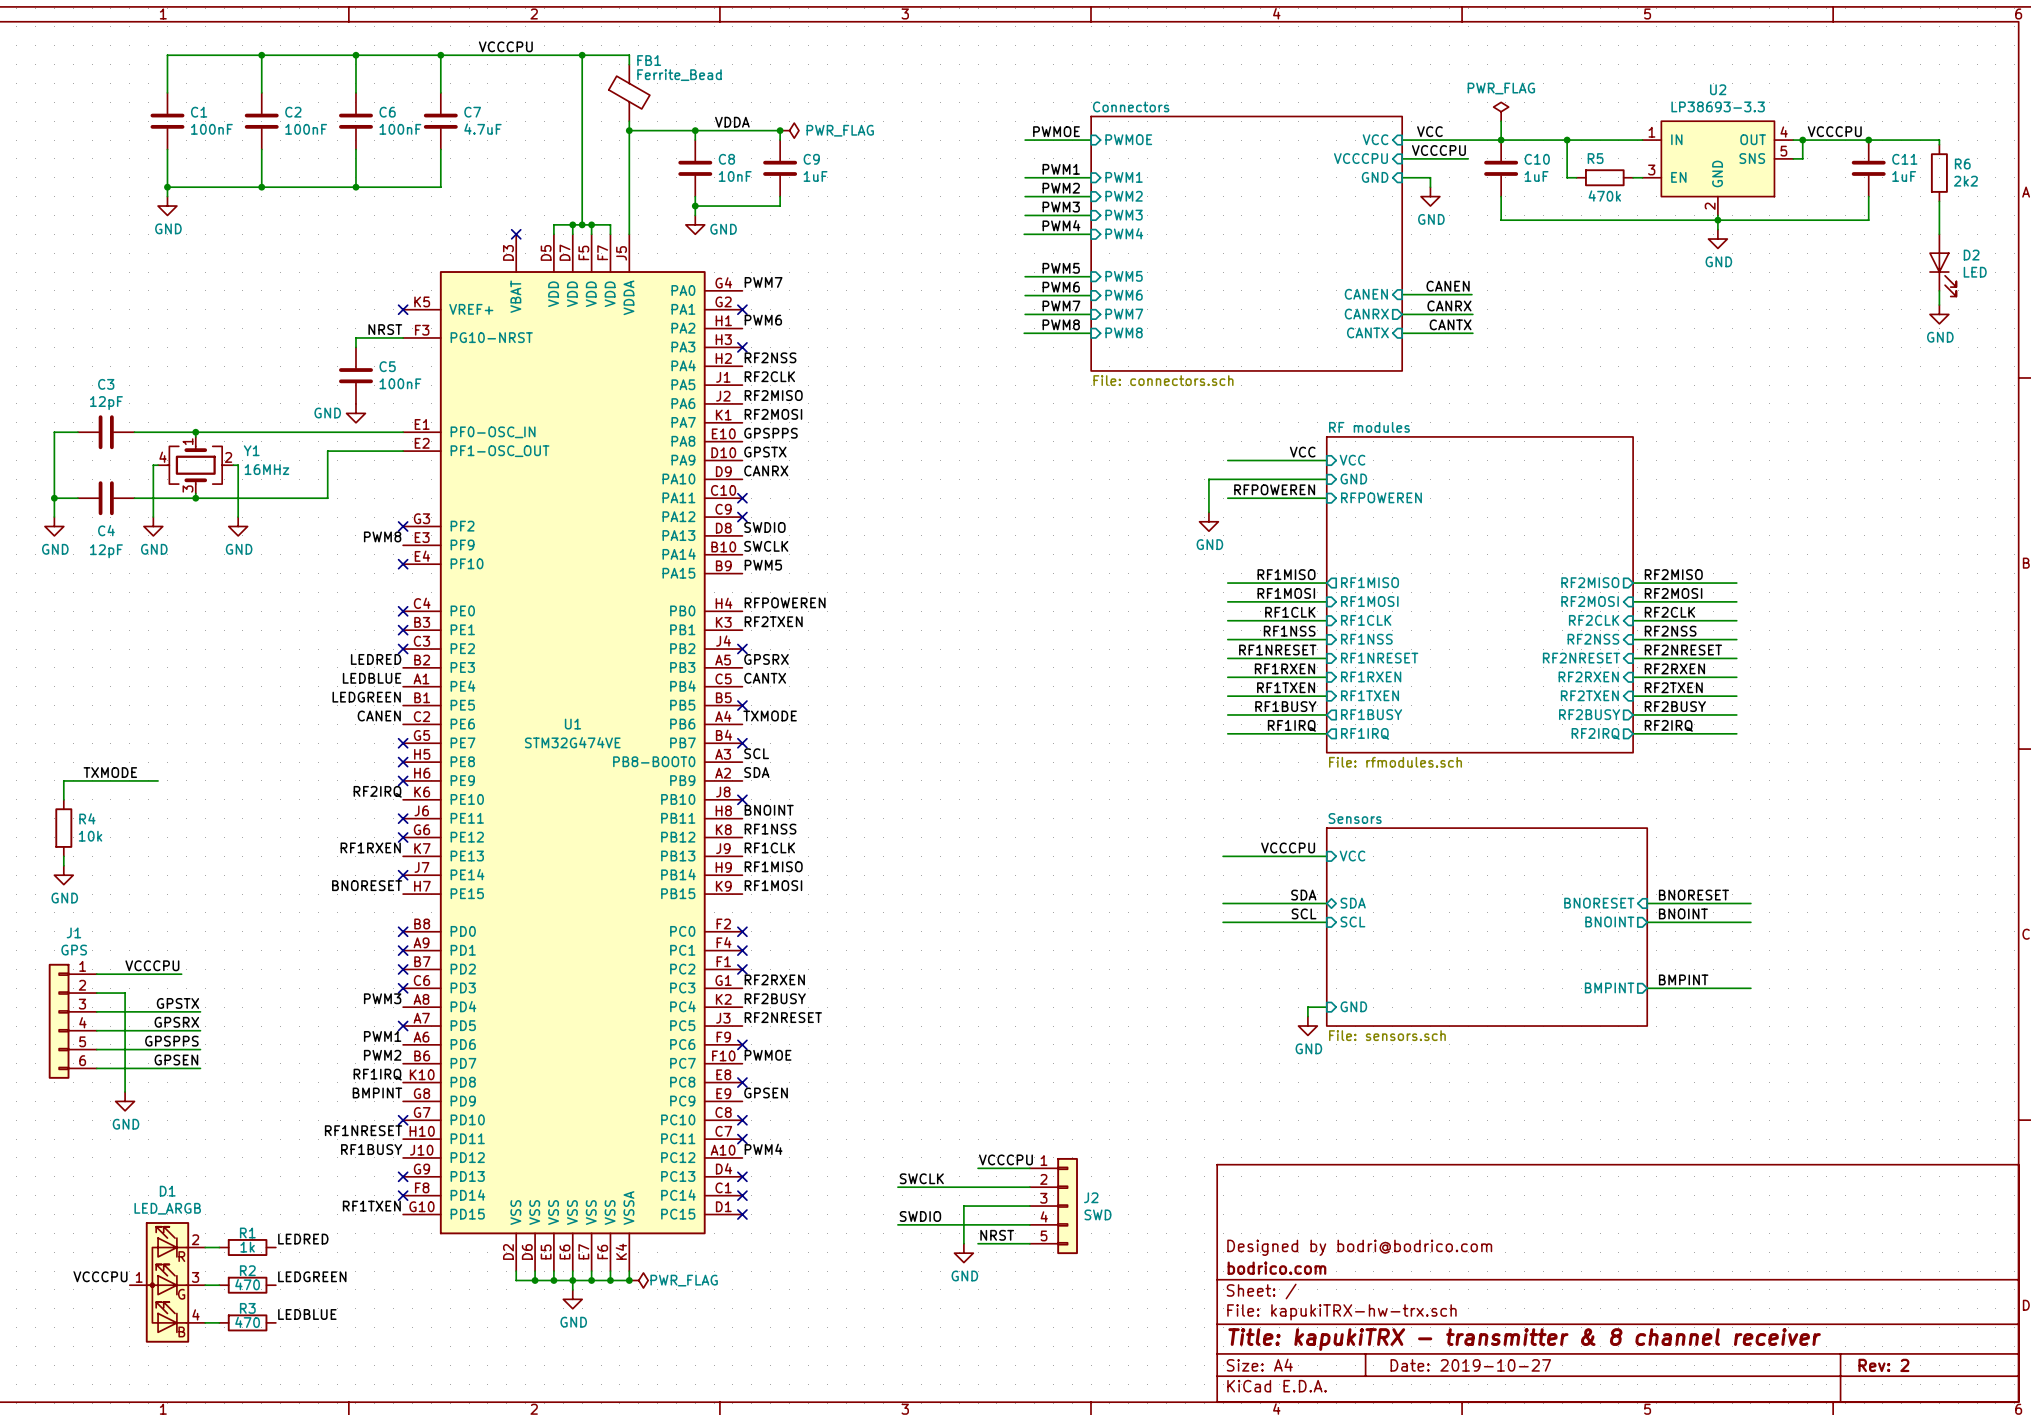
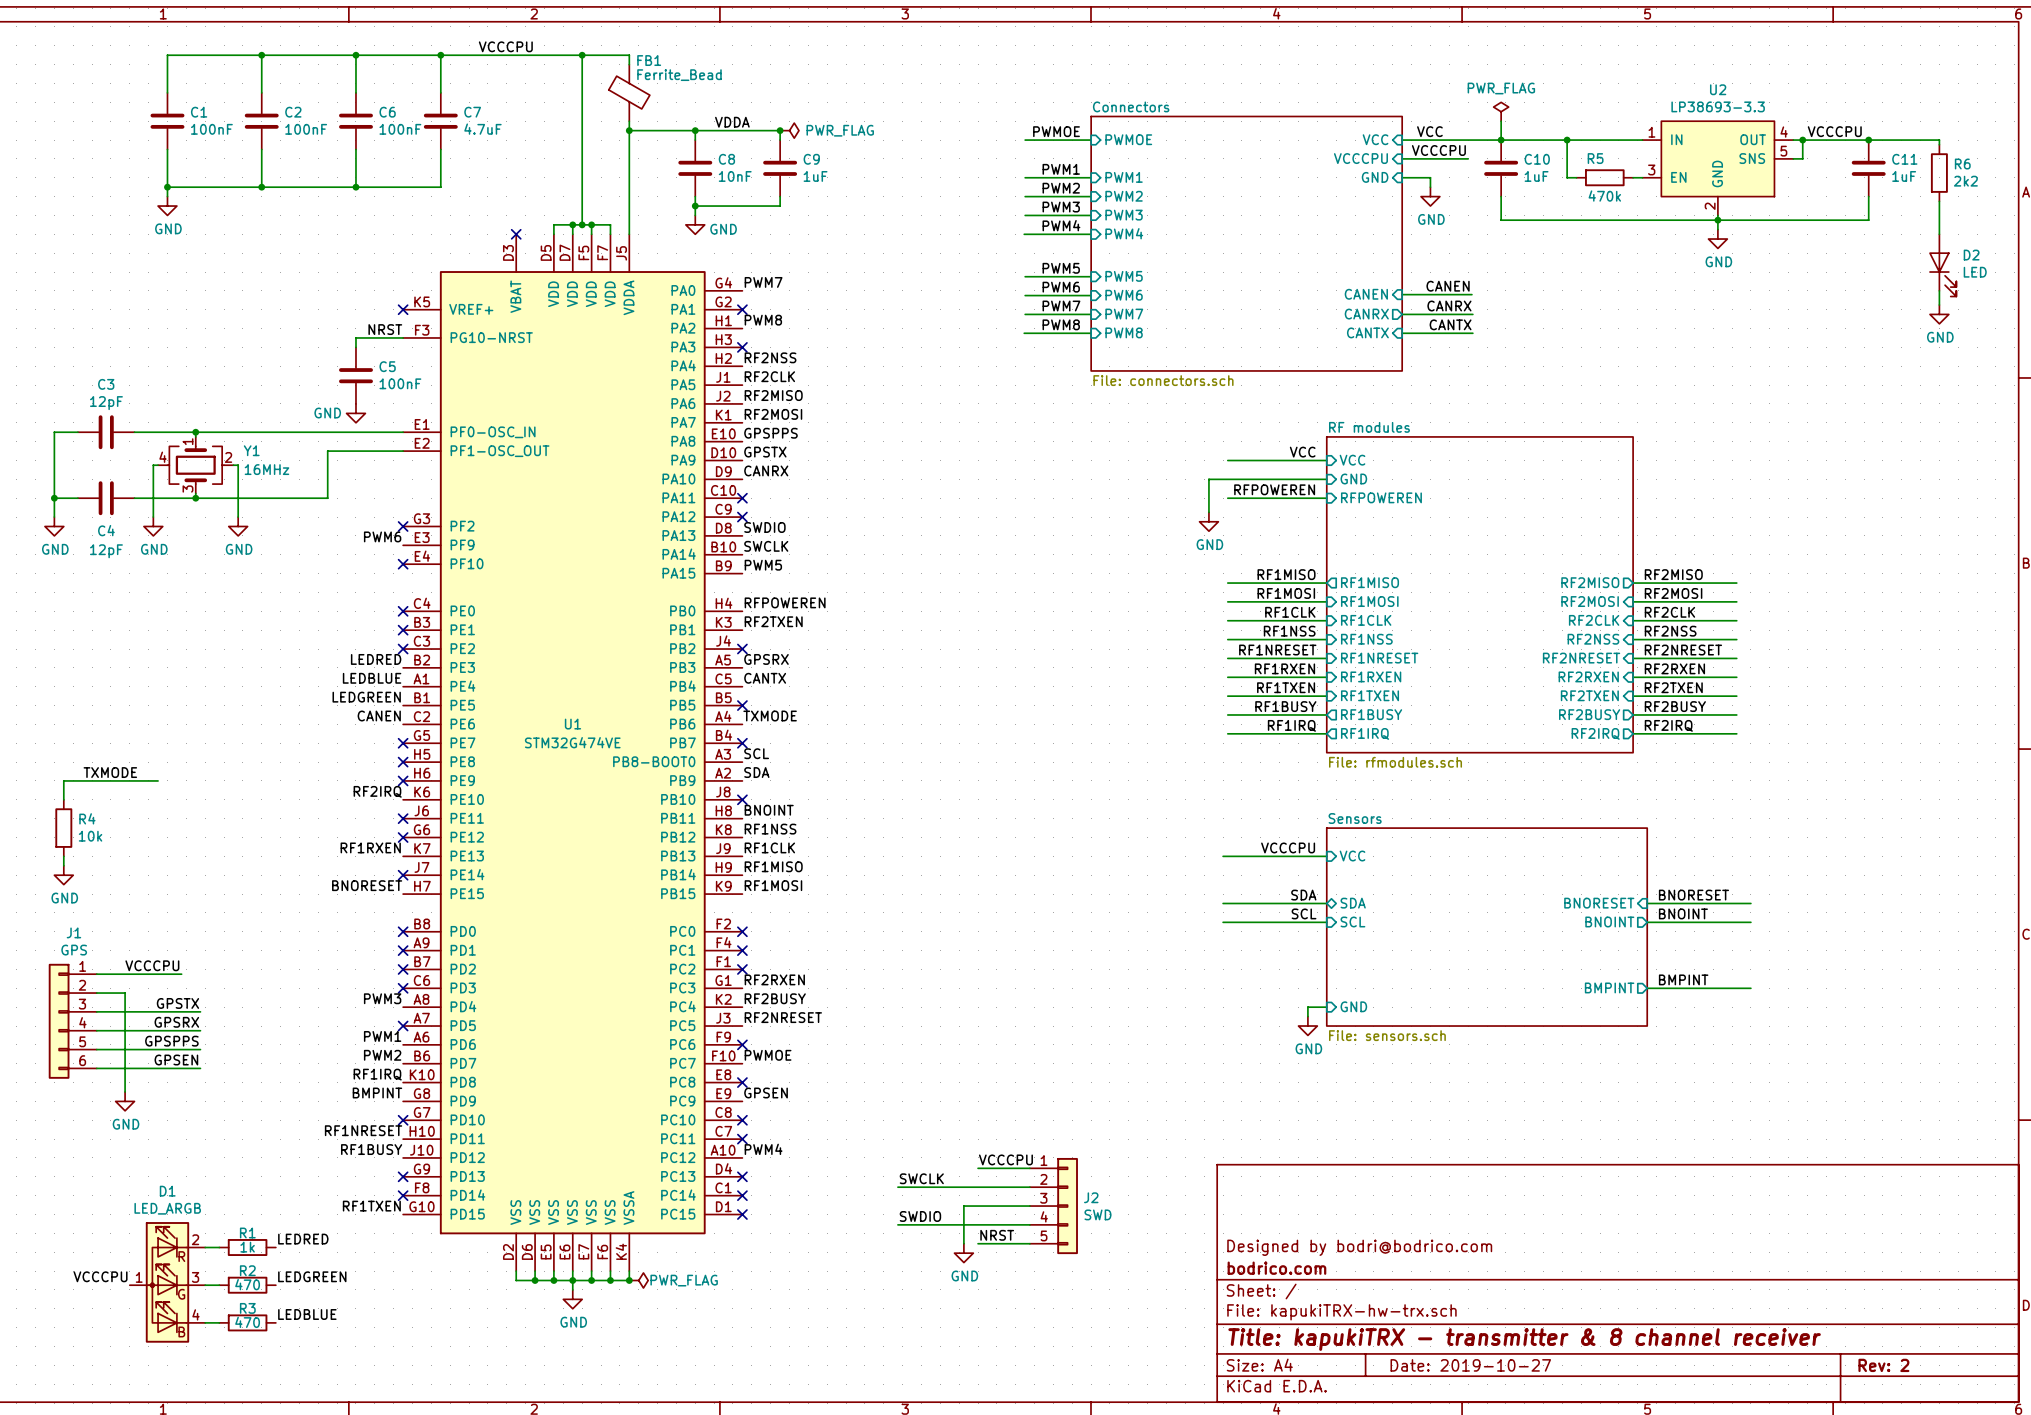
label: PWM6 (763, 320) -> PWM8 (763, 320)
label: PWM8 (382, 536) -> PWM6 (382, 536)

